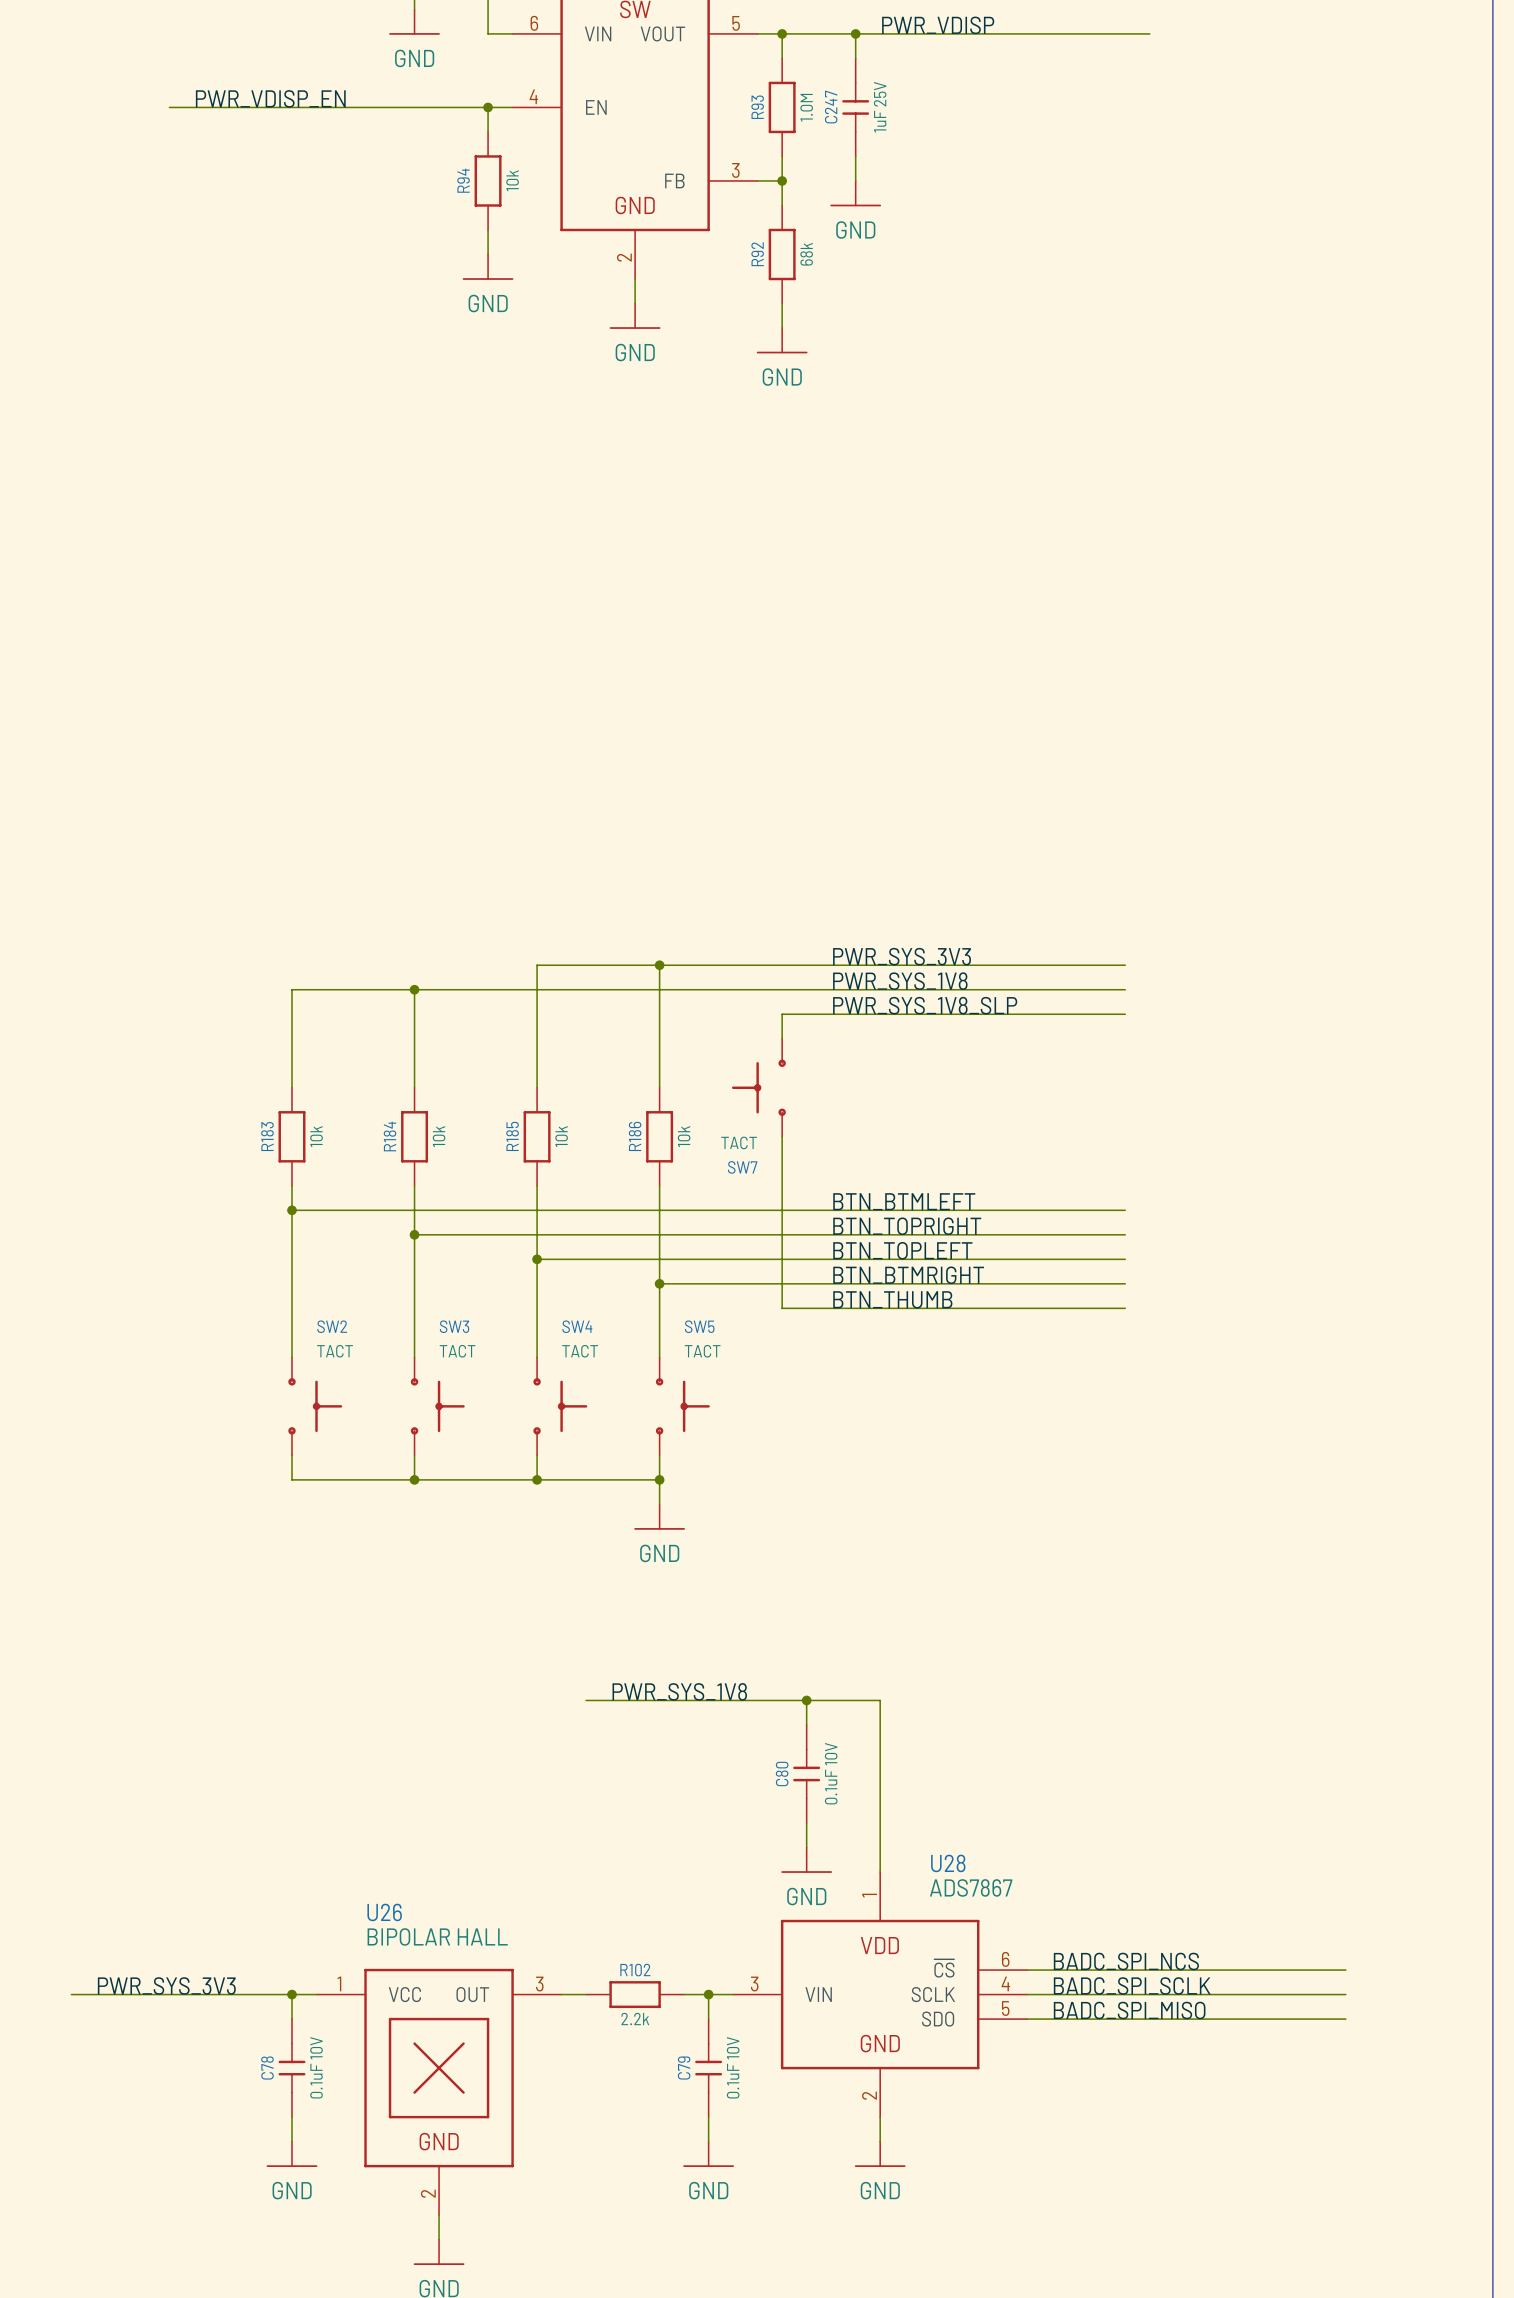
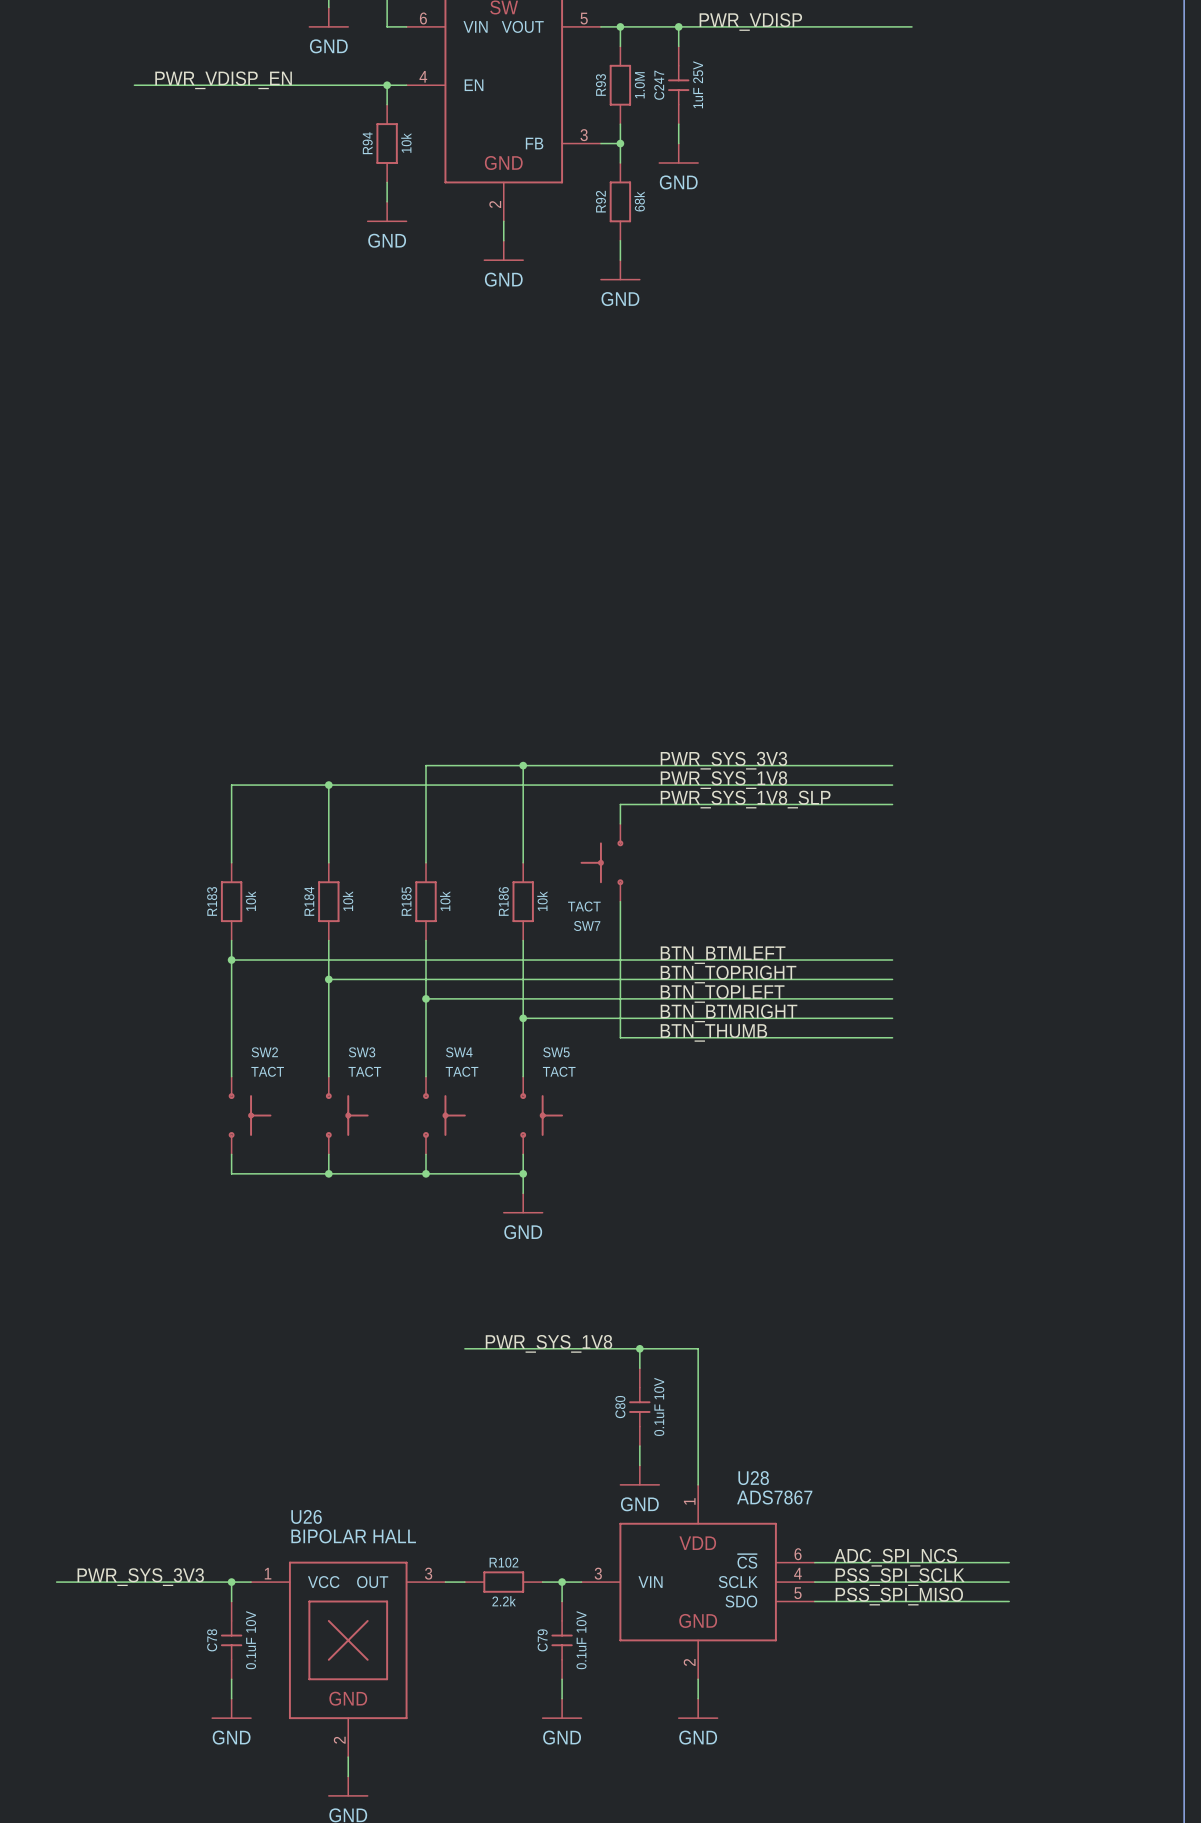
label: BADC_SPI_NCS (1126, 1961) -> ADC_SPI_NCS (895, 1557)
wire: (1272, 1970) (1345, 1970) -> none
label: BADC_SPI_SCLK (1132, 1986) -> PSS_SPI_SCLK (900, 1577)
wire: (1272, 1994) (1345, 1994) -> none
label: BADC_SPI_MISO (1129, 2010) -> PSS_SPI_MISO (899, 1596)
wire: (1272, 2019) (1345, 2019) -> none

